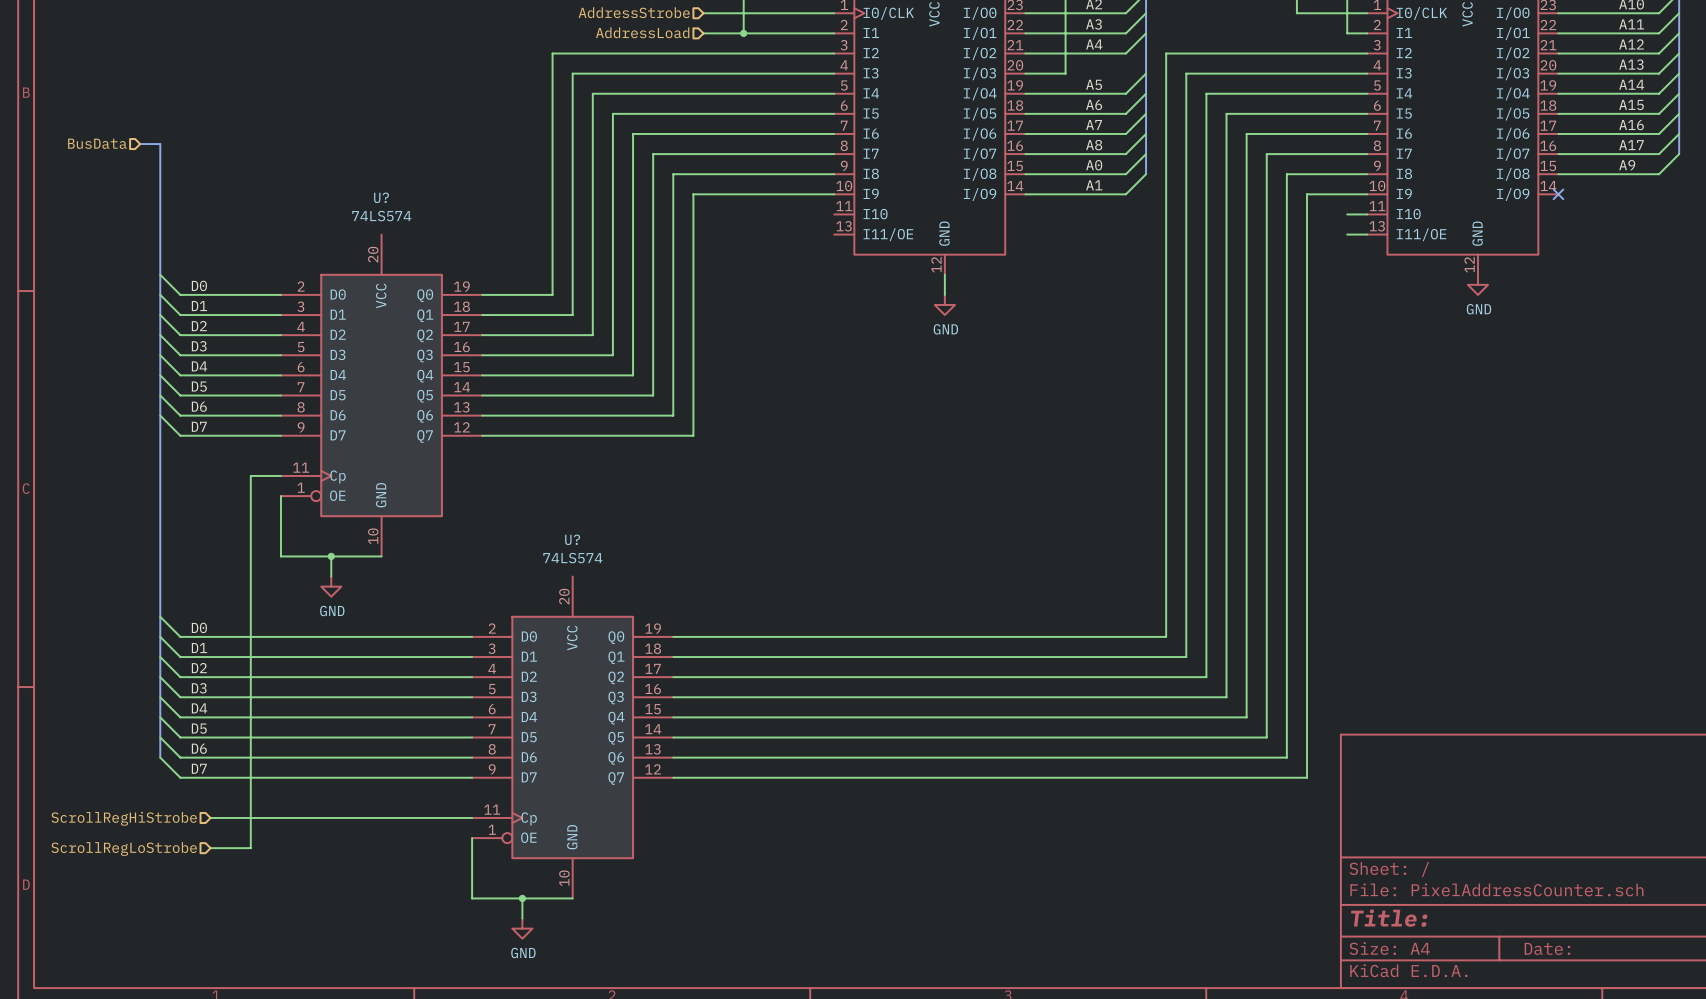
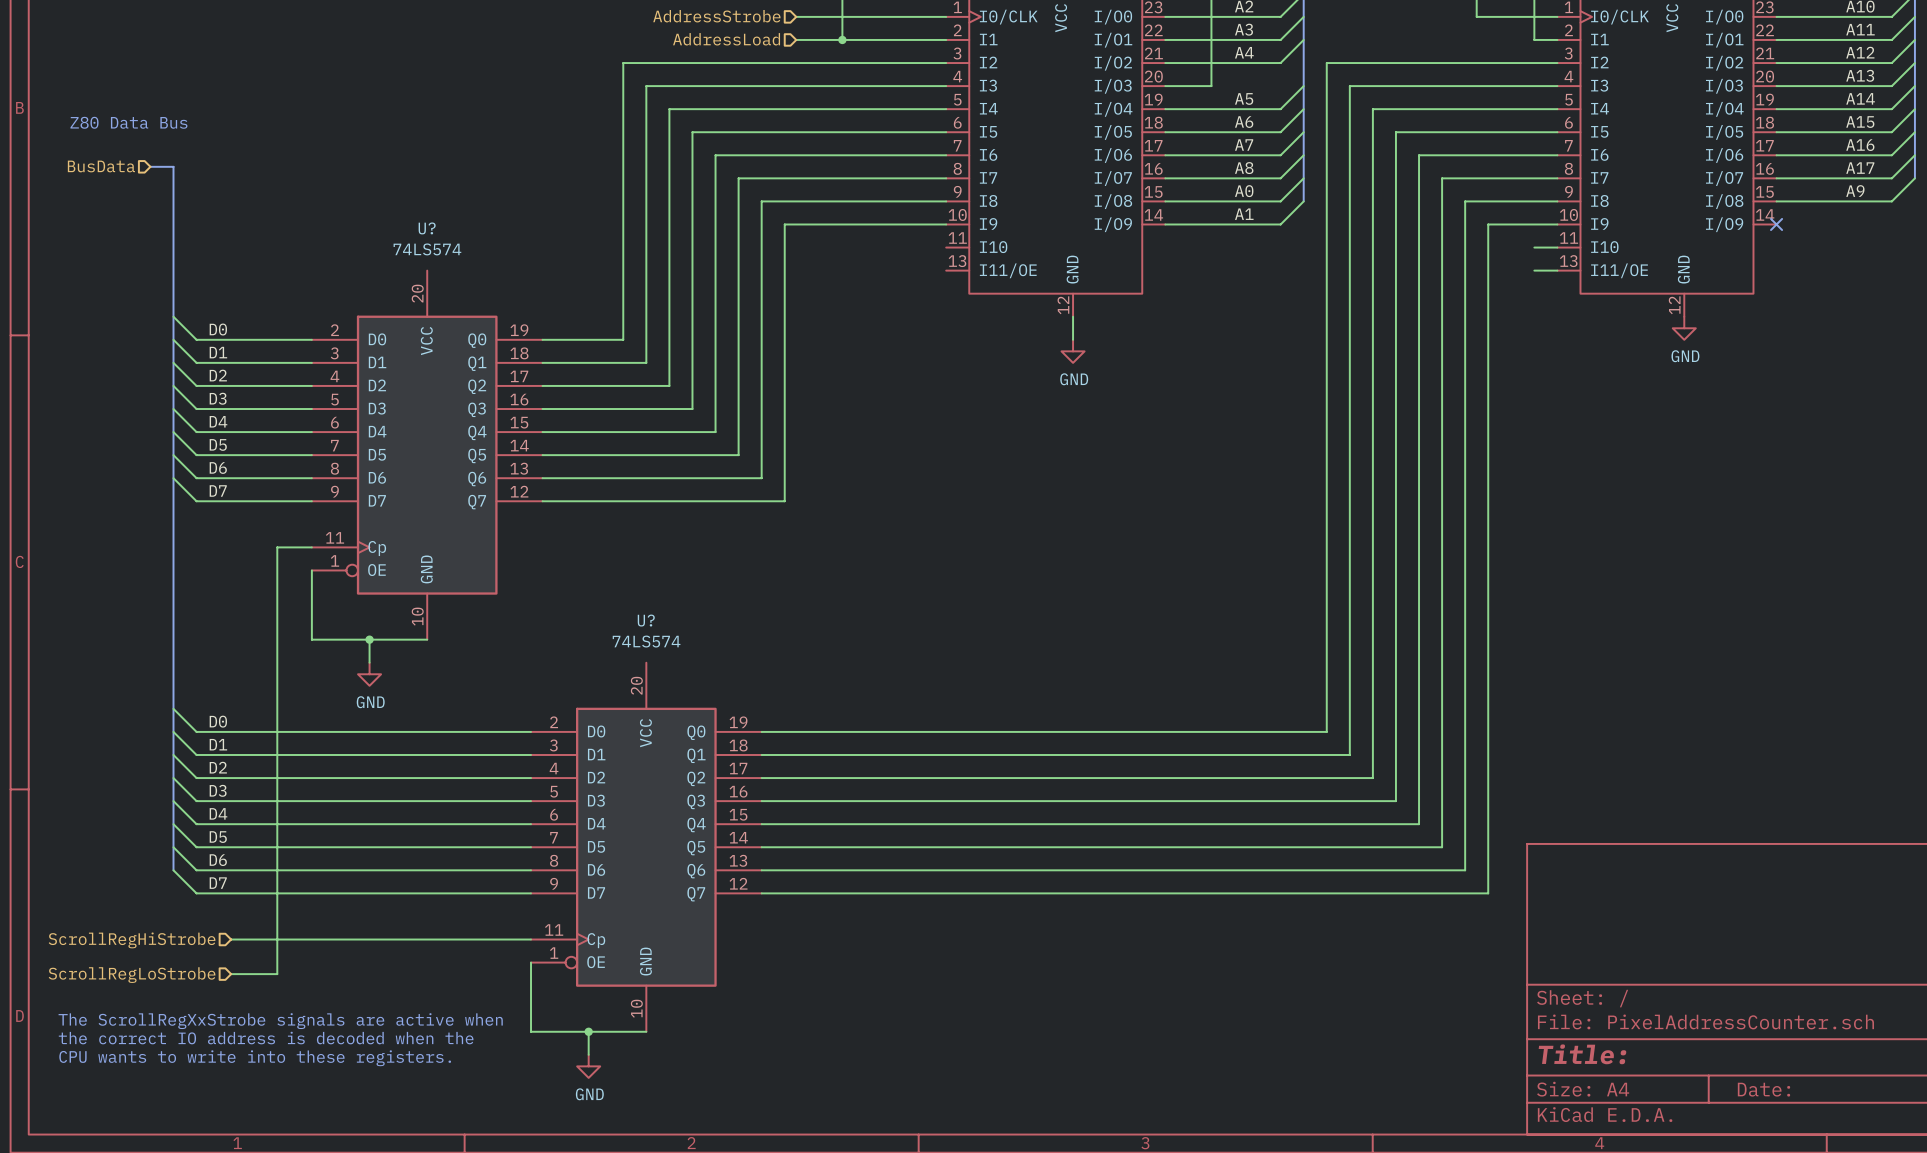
text: none -> Z80 Data Bus (128, 122)
text: none -> The ScrollRegXxStrobe signals are active when (280, 1021)
text: none -> the correct IO address is decoded when the (266, 1038)
text: none -> CPU wants to write into these registers. (255, 1058)

